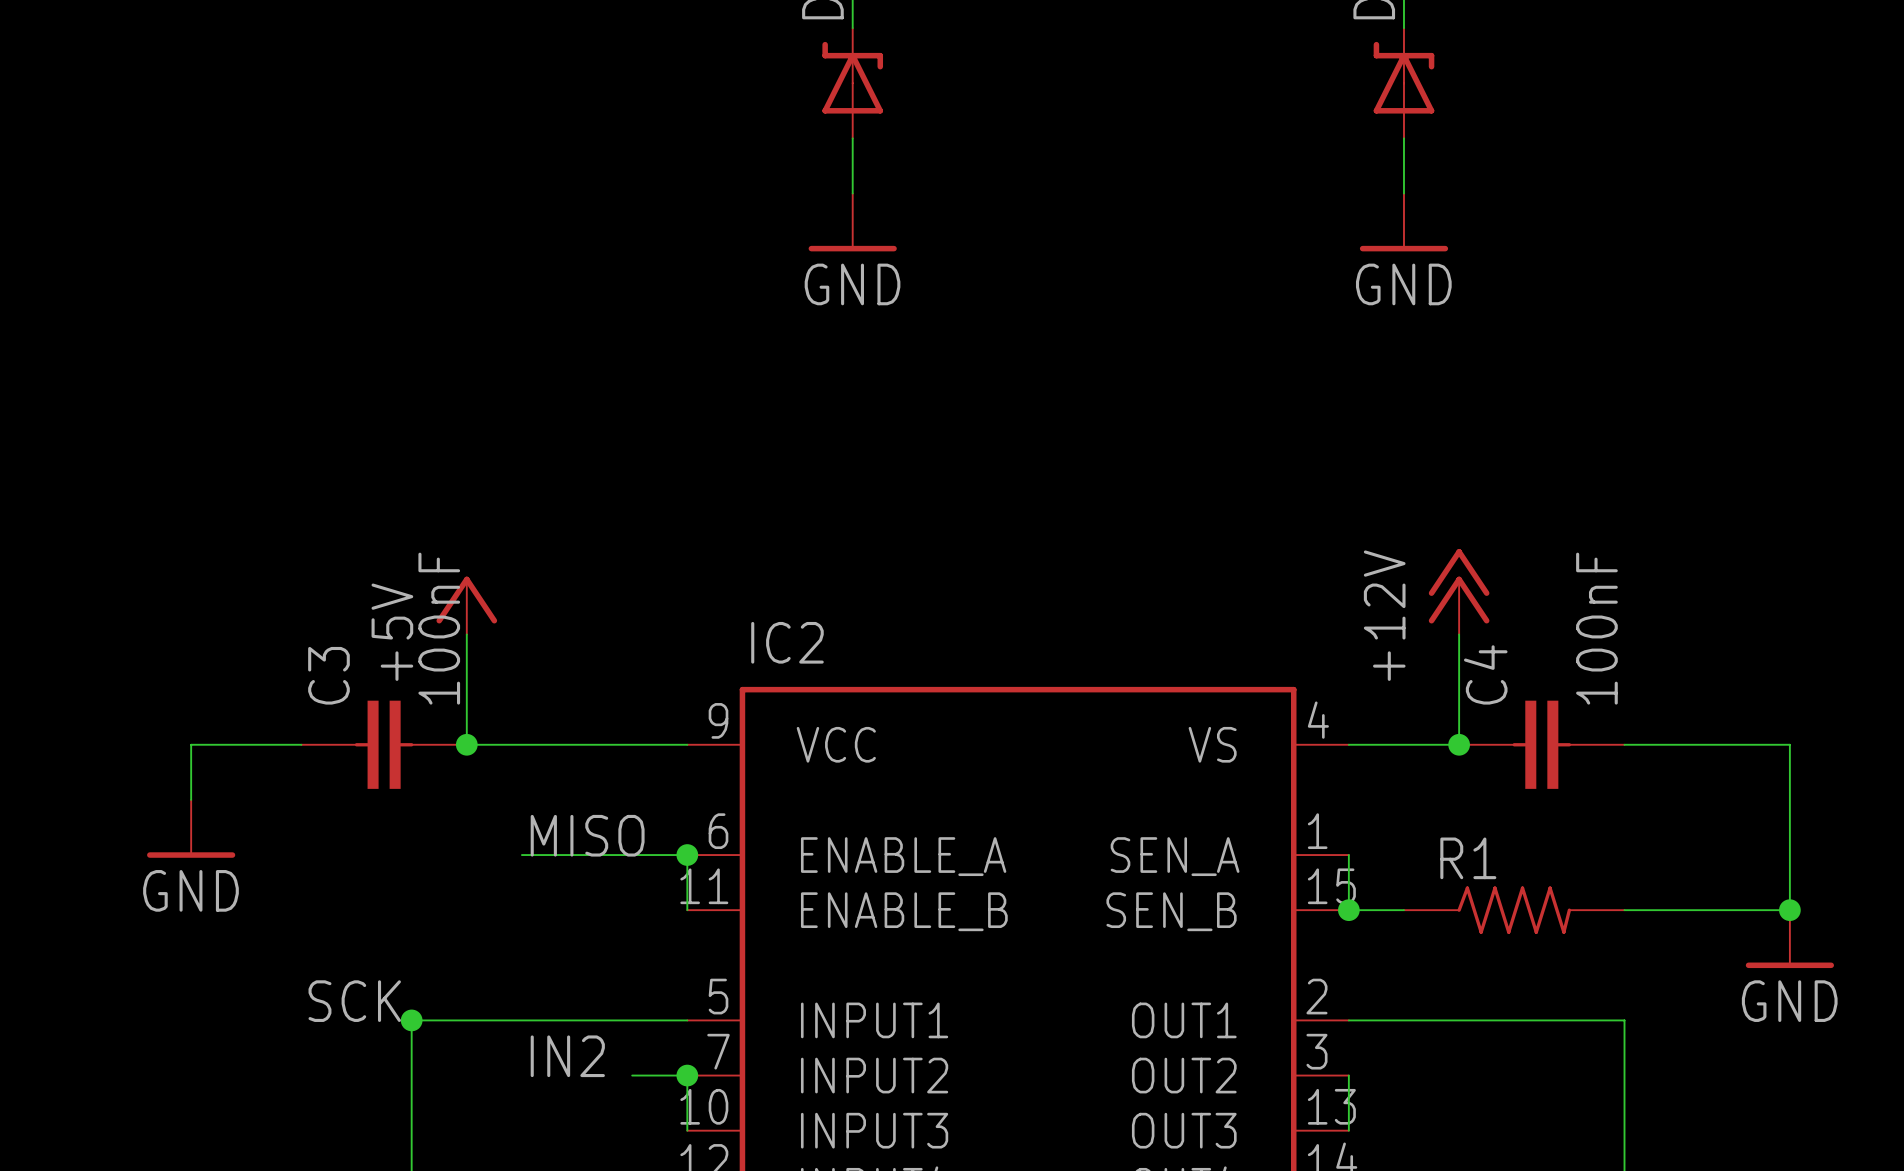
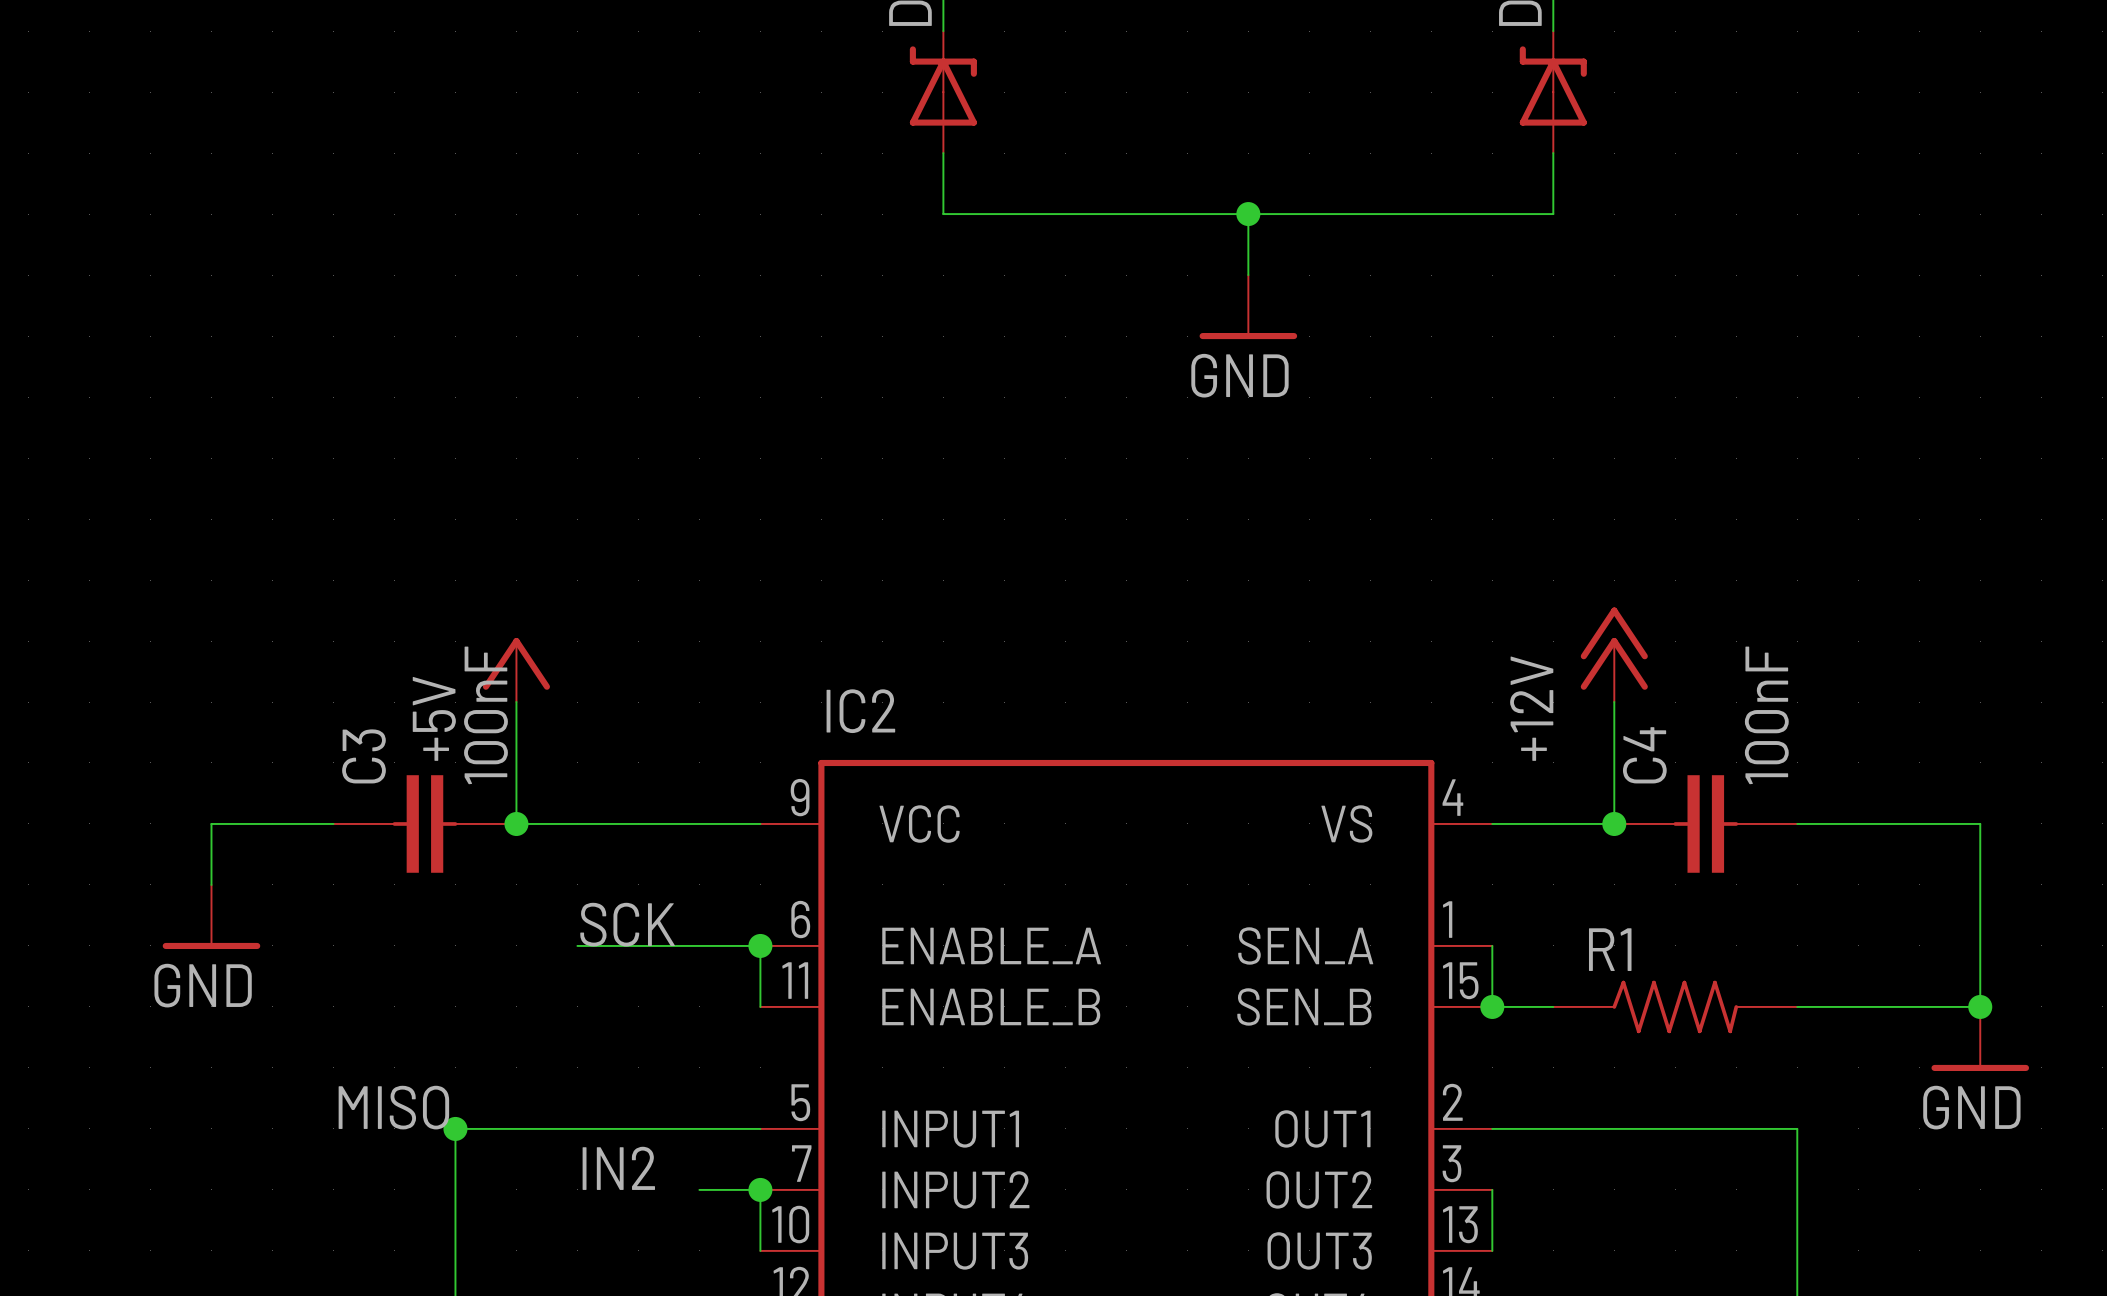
wire: none -> (943, 214) (1553, 214)
wire: none -> (1248, 214) (1248, 275)
junction: none -> (1248, 214)
power symbol: GND (852, 222) -> none
power symbol: GND (1403, 222) -> none
power symbol: none -> GND (1248, 307)
label: MISO (587, 835) -> SCK (627, 924)
label: SCK (354, 1001) -> MISO (393, 1107)

